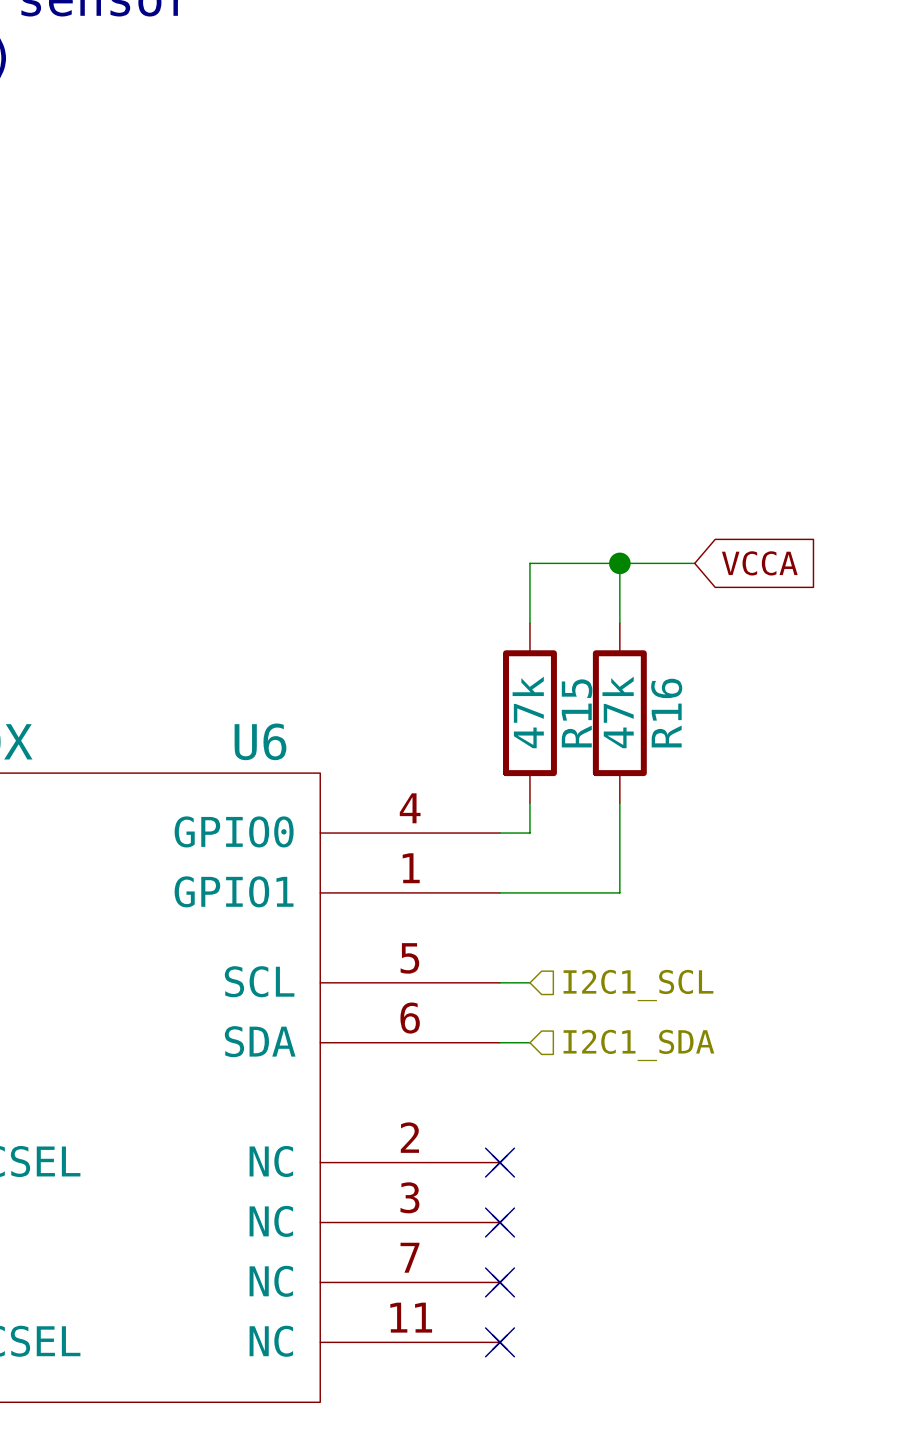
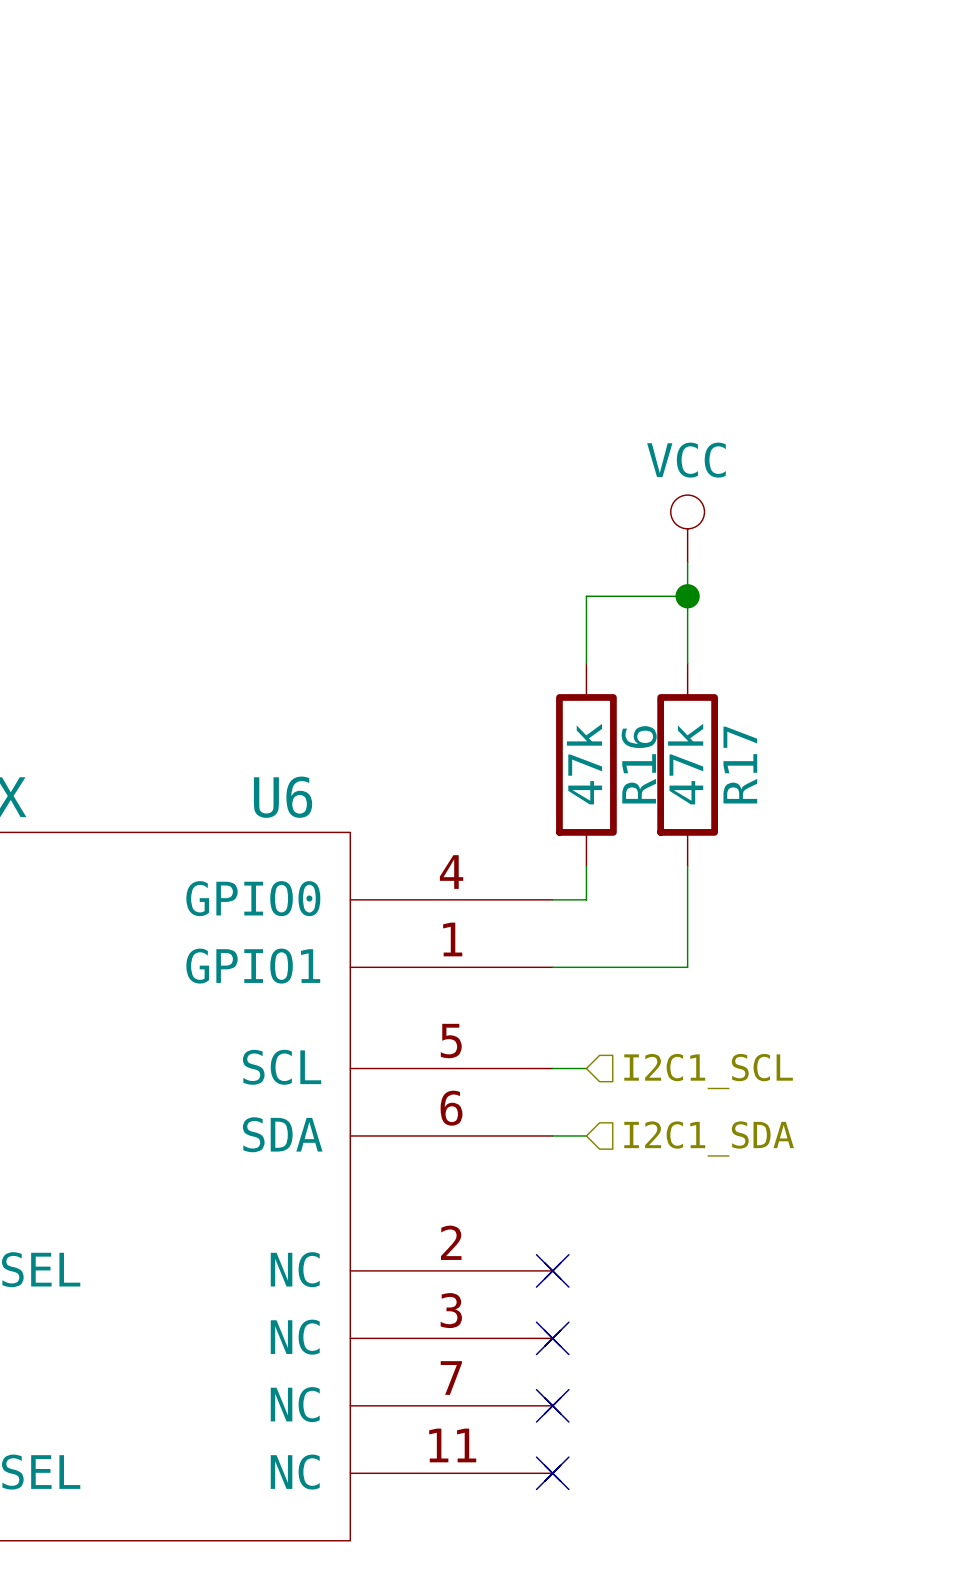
power symbol: none -> VCC (687, 528)
wire: (619, 563) (694, 563) -> (687, 596) (687, 562)
global label: VCCA (759, 563) -> none
R15 name: R15 (577, 713) -> R16 (639, 764)
R16 name: R16 (666, 713) -> R17 (740, 765)

